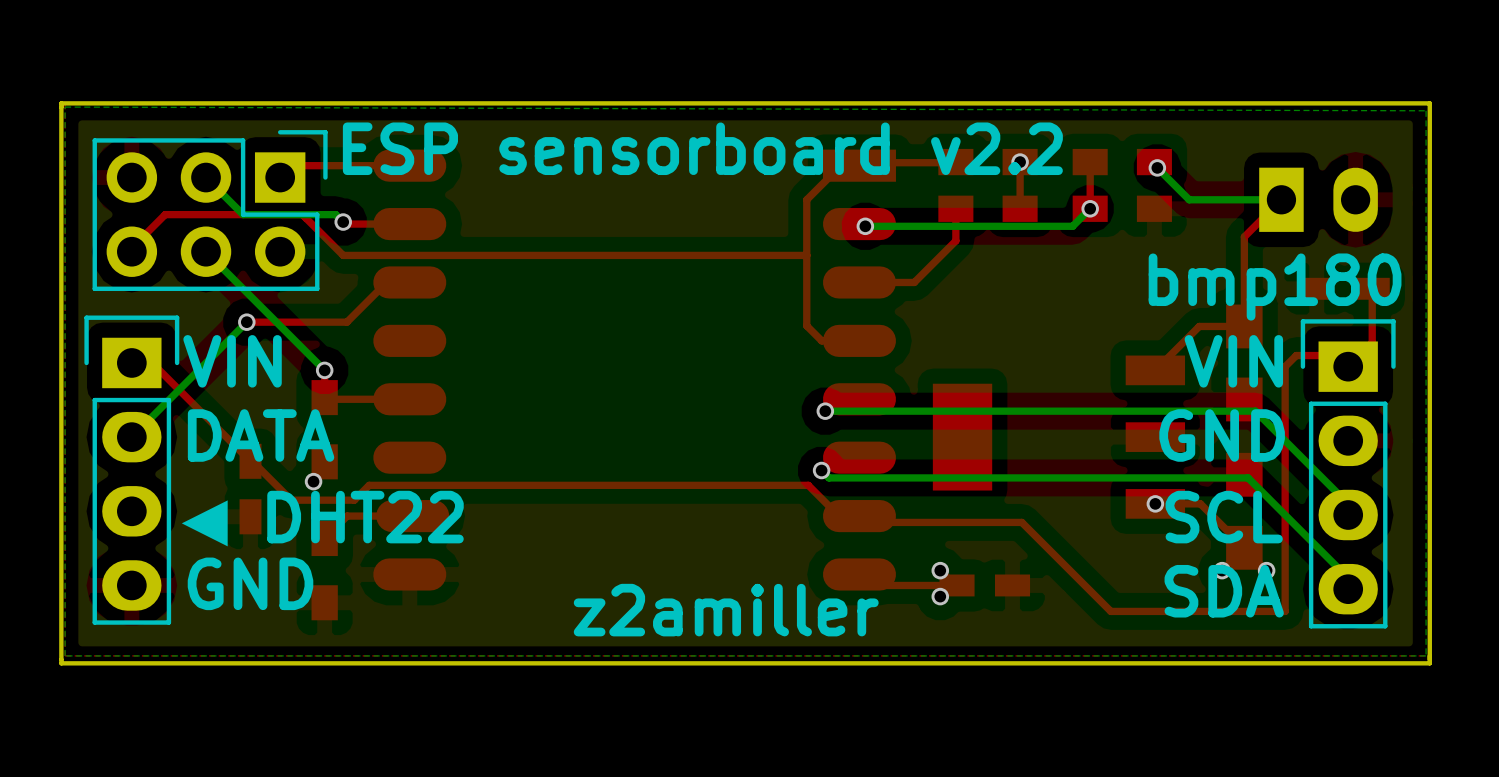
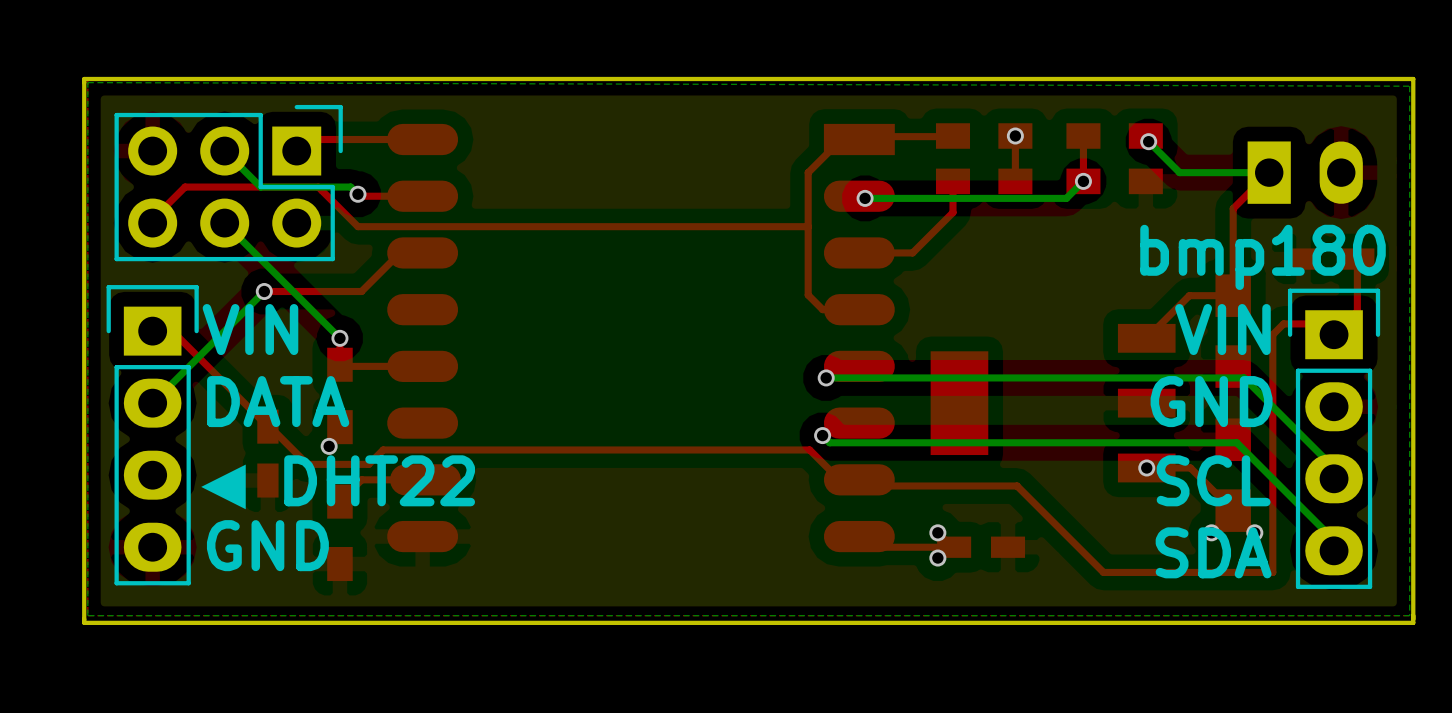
text: ESP sensorboard v2.2 (702, 148) -> none
text: z2amiller (726, 610) -> none

